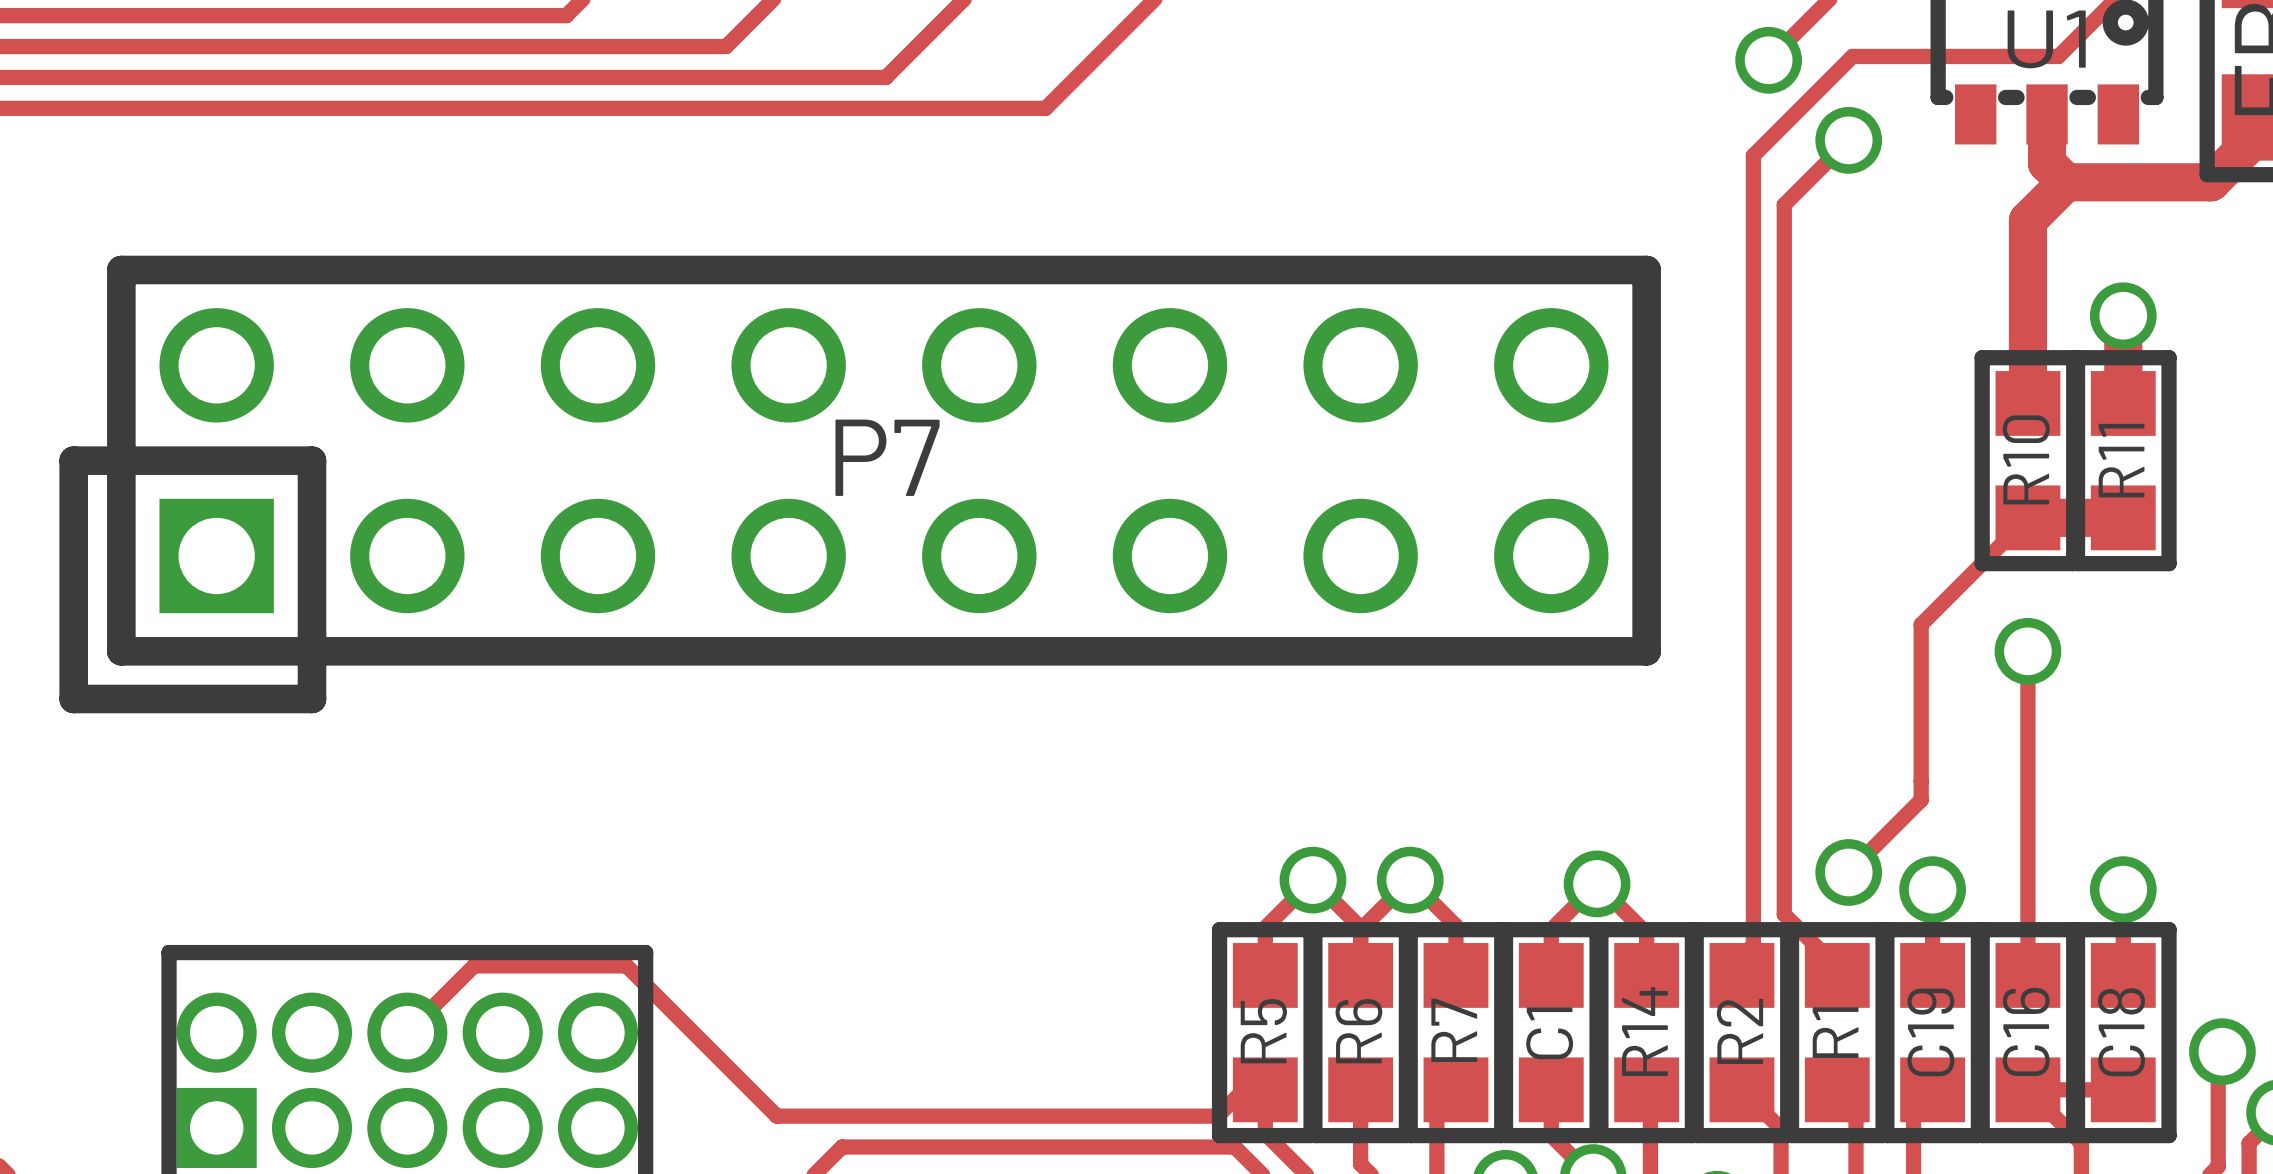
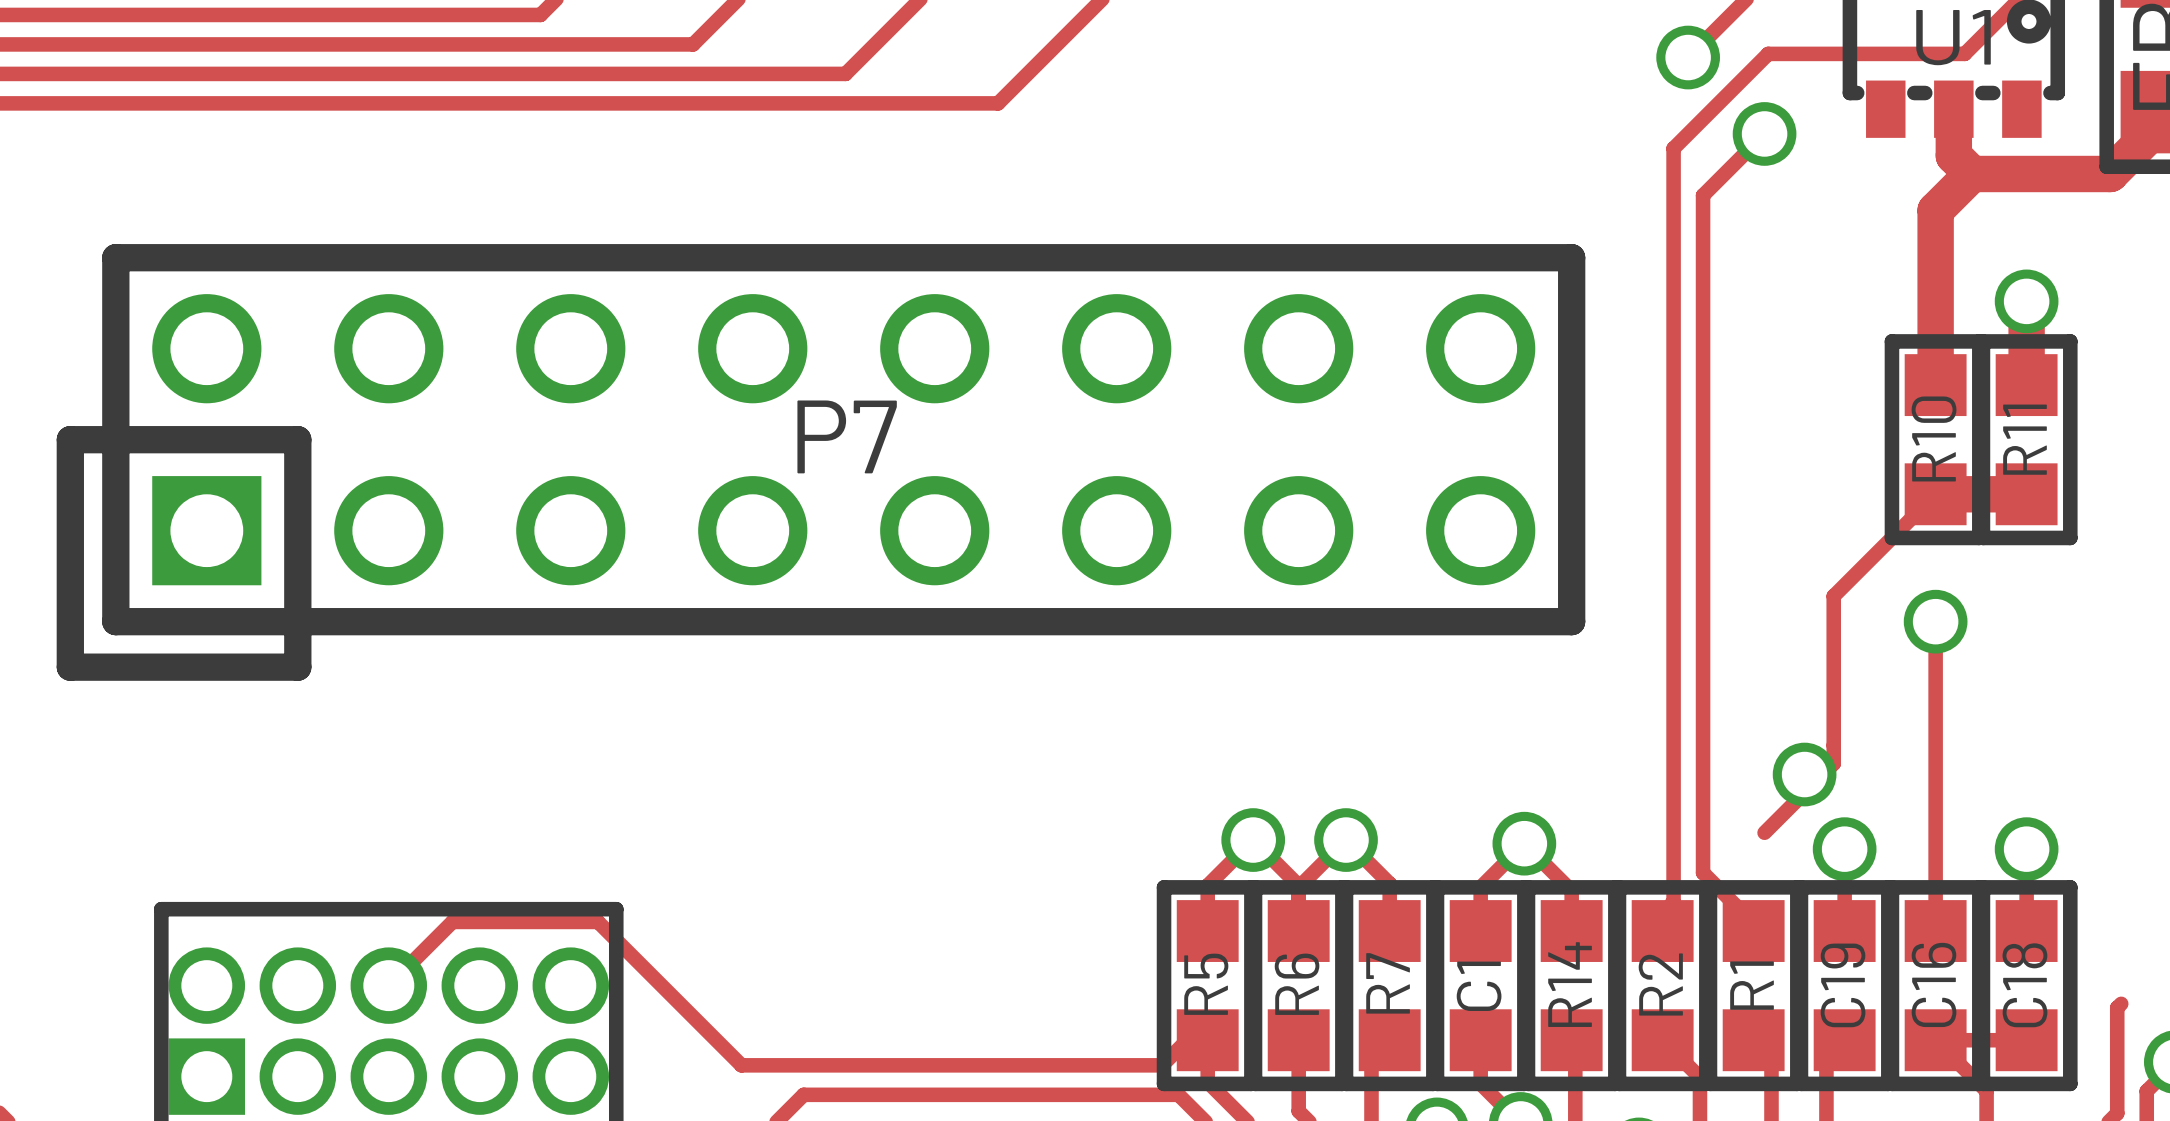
via position: (1848, 872) -> (1804, 774)
via: (2222, 1051) -> none

